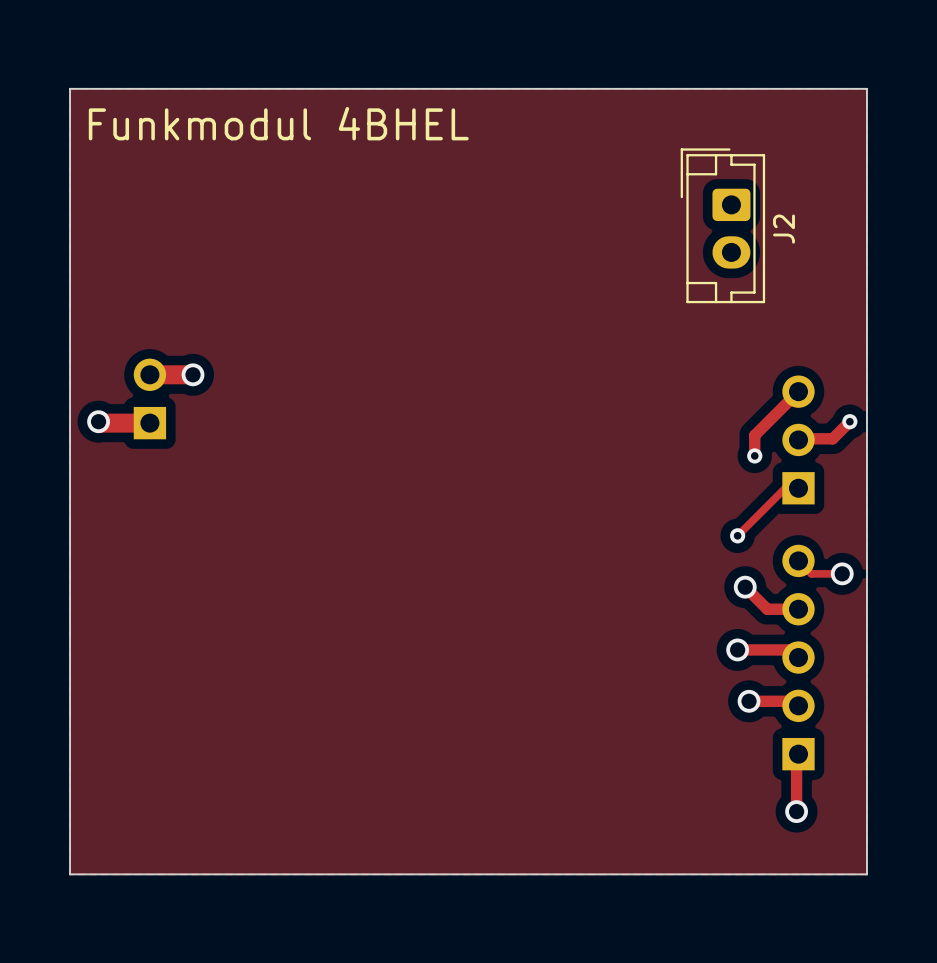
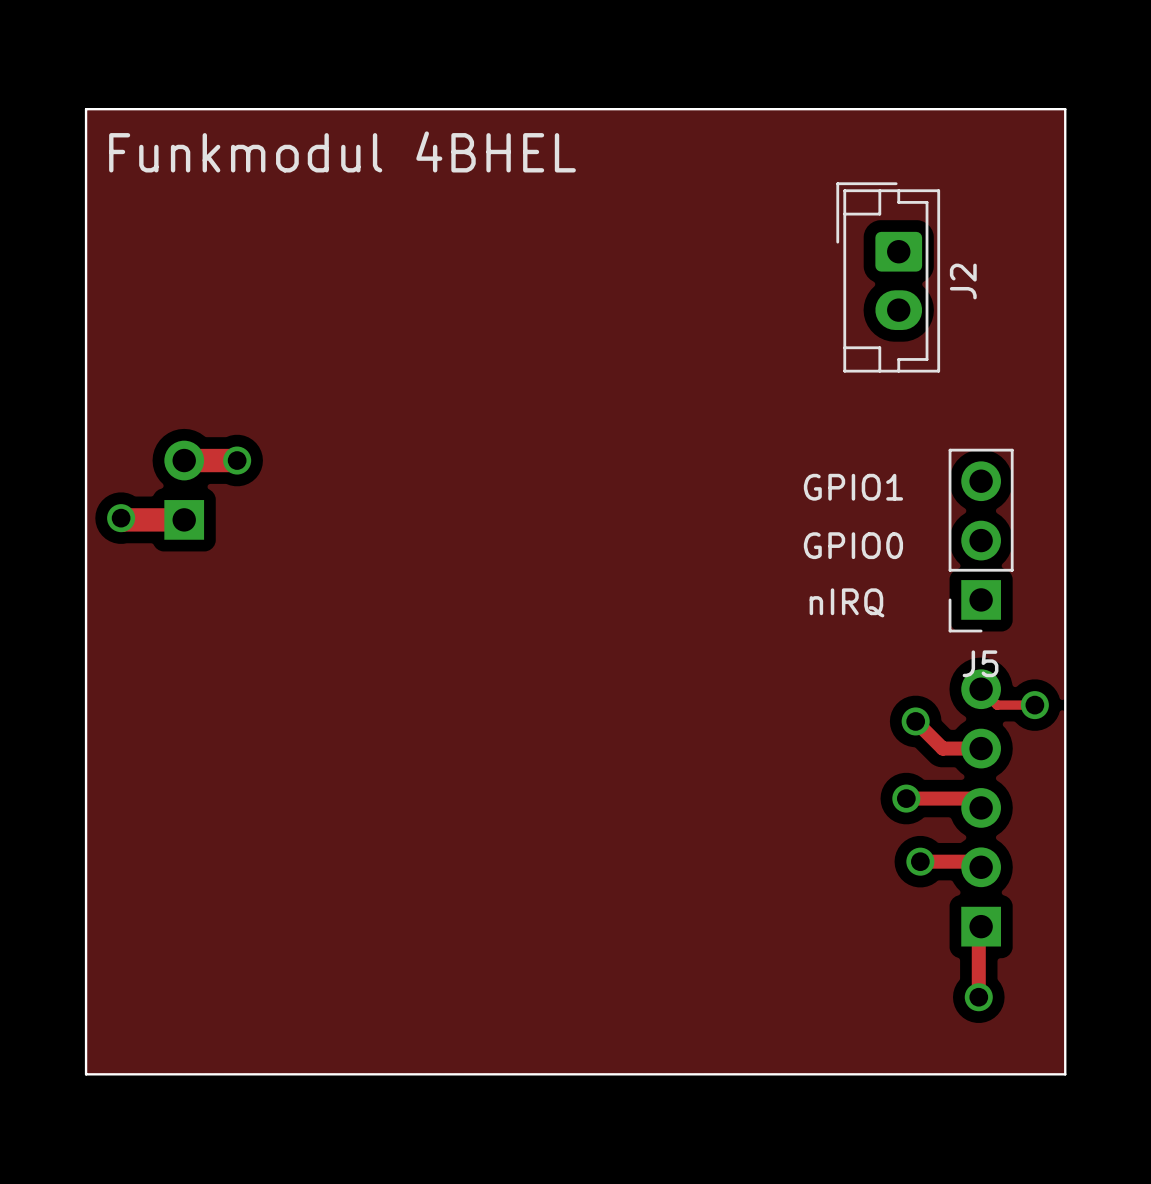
track: (798, 391) (754, 435) (754, 455) -> none
text: none -> GPIO1 (853, 487)
track: (849, 421) (832, 438) (798, 439) -> none
via: (849, 421) -> none
J5 side: bottom (798, 439) -> top (981, 540)
text: none -> GPIO0 (853, 545)
via: (754, 455) -> none
track: (798, 488) (785, 488) (737, 535) -> none
text: none -> nIRQ (846, 602)
via: (737, 535) -> none

